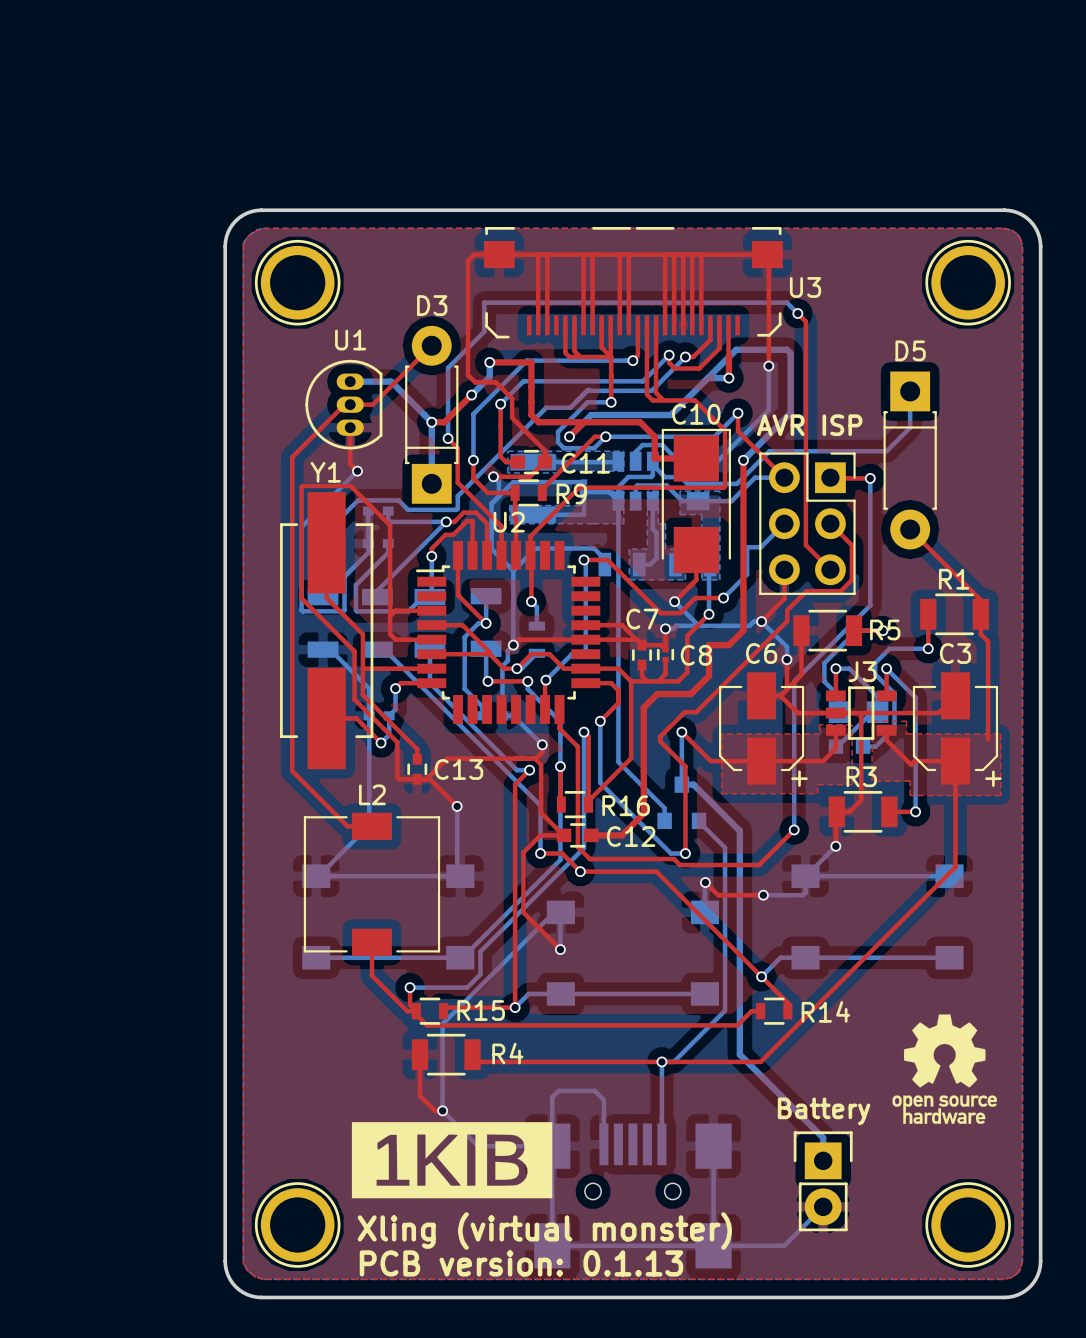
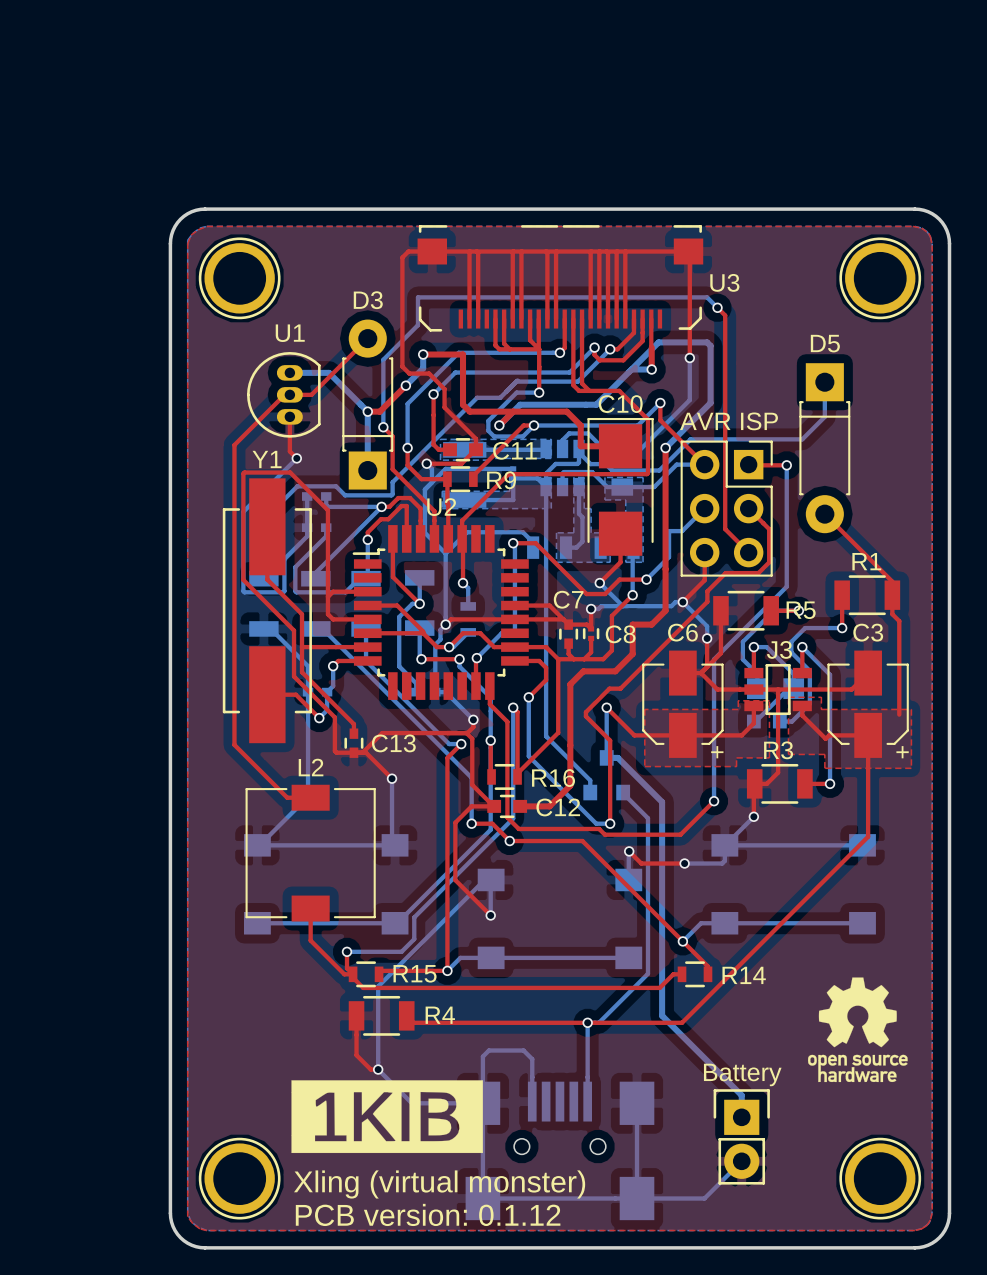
text: AVR ISP (809, 425) -> none
part value: none -> AVR ISP (728, 421)
text: Battery (824, 1111) -> none
part value: none -> Battery (742, 1074)
text: PCB version: 0.1.13 (521, 1263) -> PCB version: 0.1.12 (428, 1214)

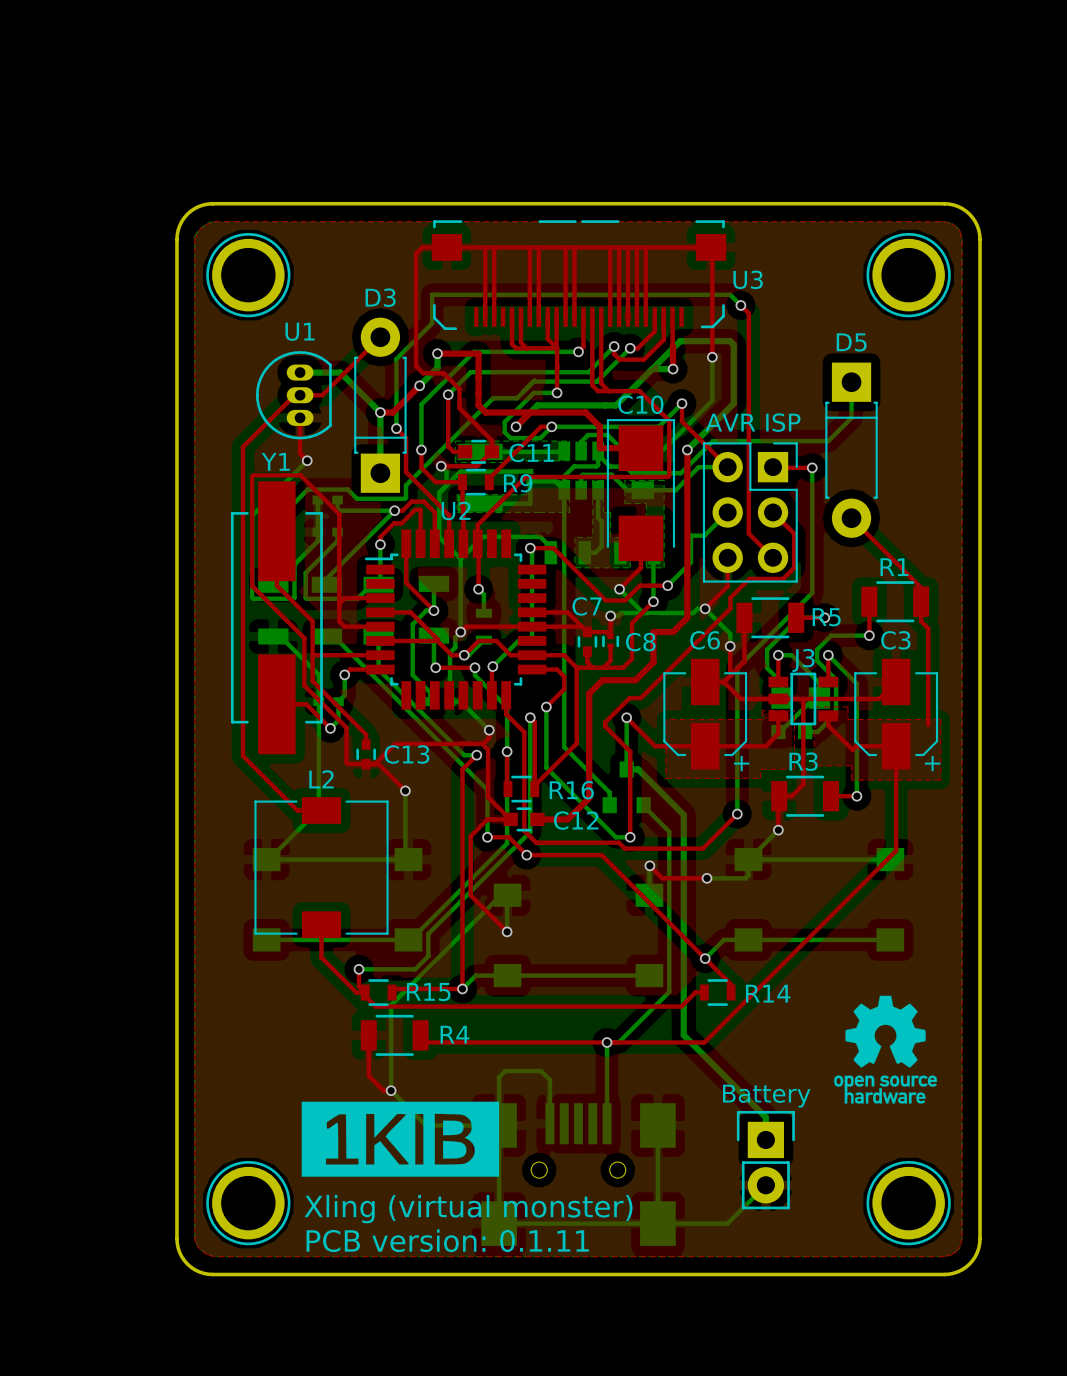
text: PCB version: 0.1.12 (428, 1214) -> PCB version: 0.1.11 (447, 1240)

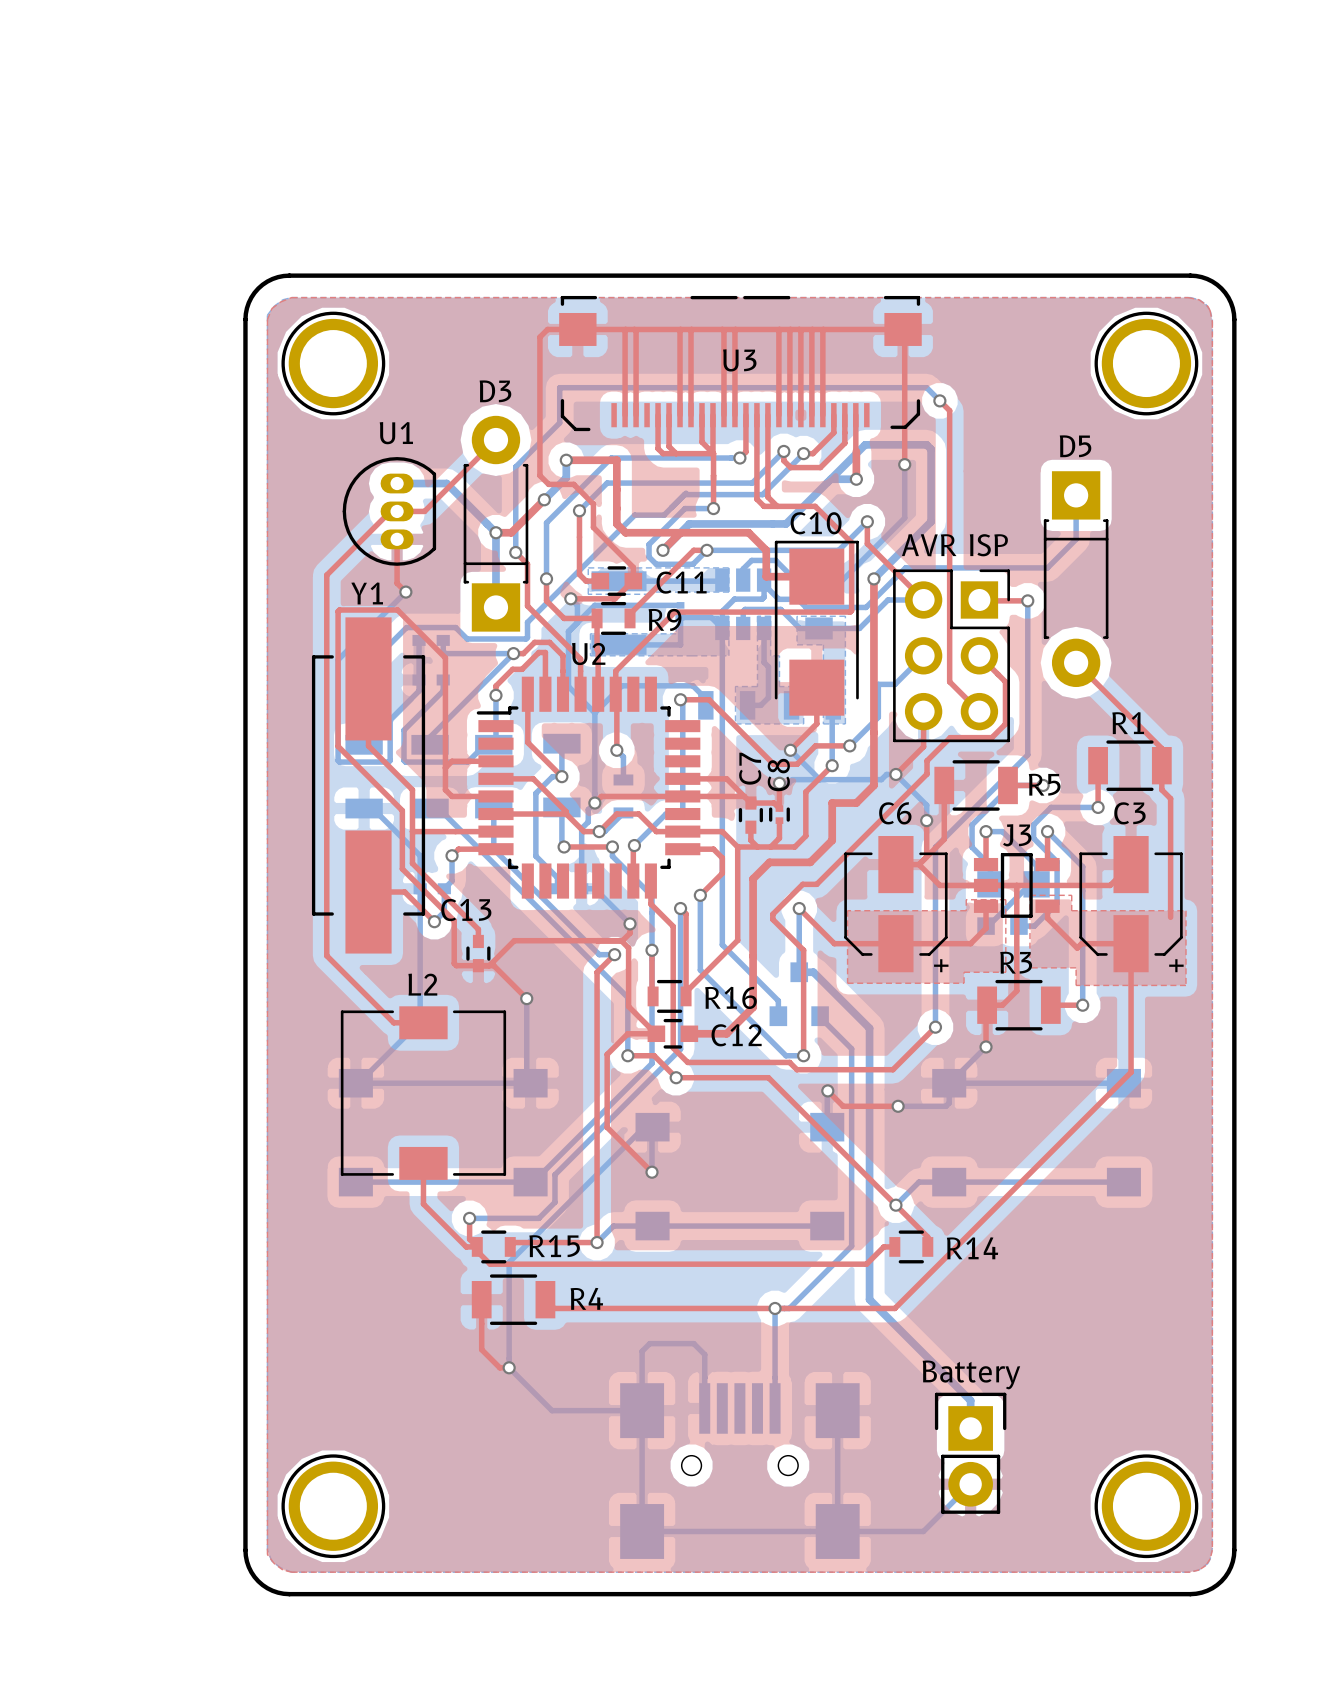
U3 name position: U3 (748, 279) -> U3 (739, 360)
C7 name rotation: 0° (587, 606) -> 90° counterclockwise (750, 768)
C8 name rotation: 0° (640, 642) -> 90° counterclockwise (778, 775)
C8 name position: C8 (640, 642) -> C8 (778, 775)
C13 name position: C13 (406, 754) -> C13 (466, 910)
drawing: [834, 995, 937, 1104] -> none
drawing: [301, 1101, 500, 1177] -> none
text: Xling (virtual monster) (468, 1209) -> none
text: PCB version: 0.1.11 (447, 1240) -> none

